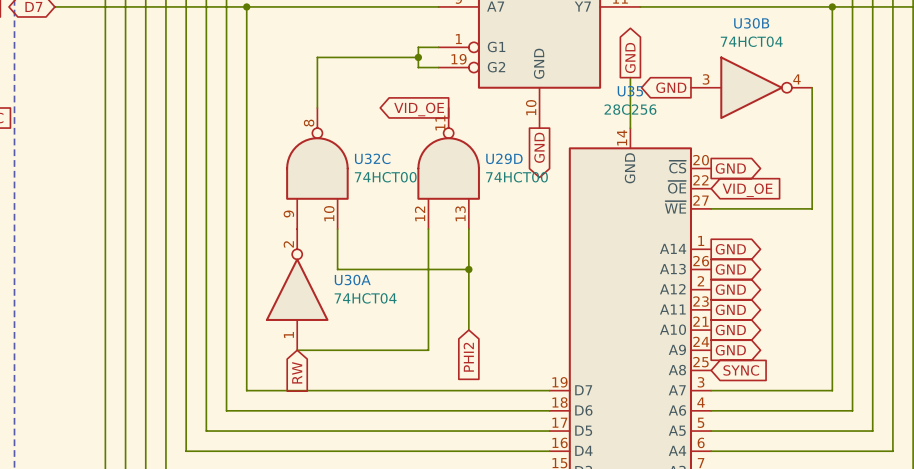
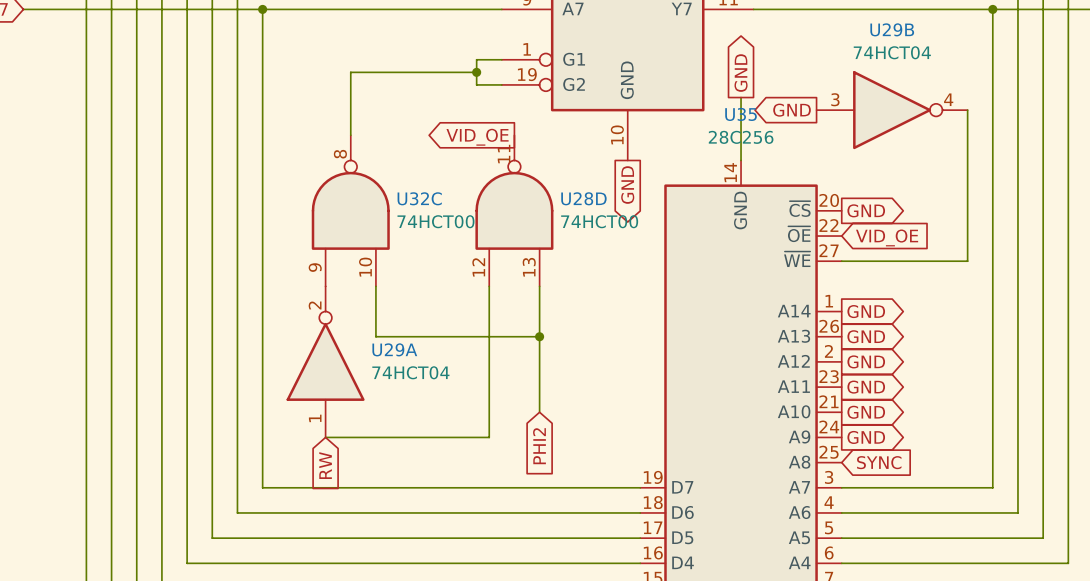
U30B name: U30B (751, 23) -> U29B (892, 29)
U29D name: U29D (504, 158) -> U28D (583, 198)
U30A name: U30A (352, 280) -> U29A (394, 349)

